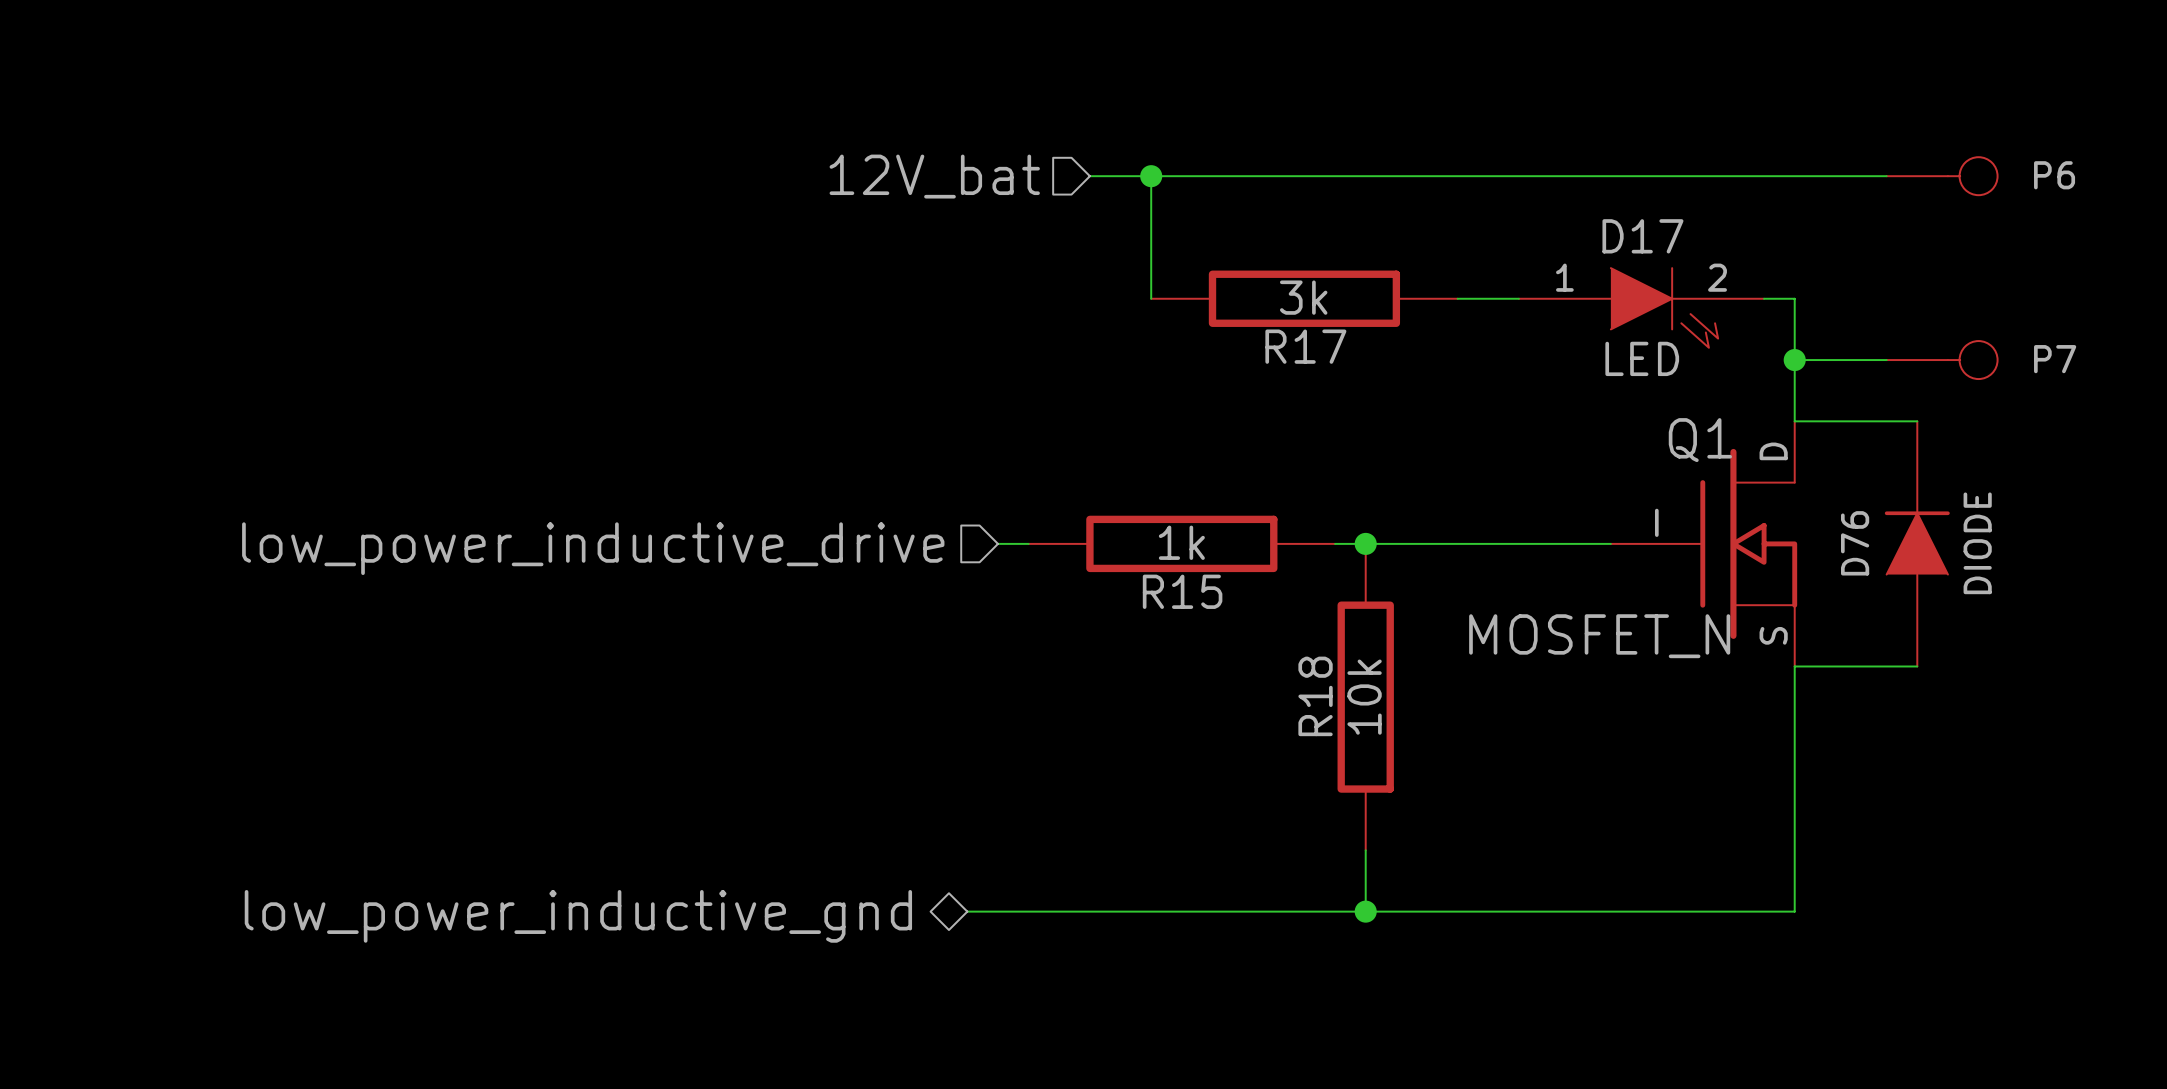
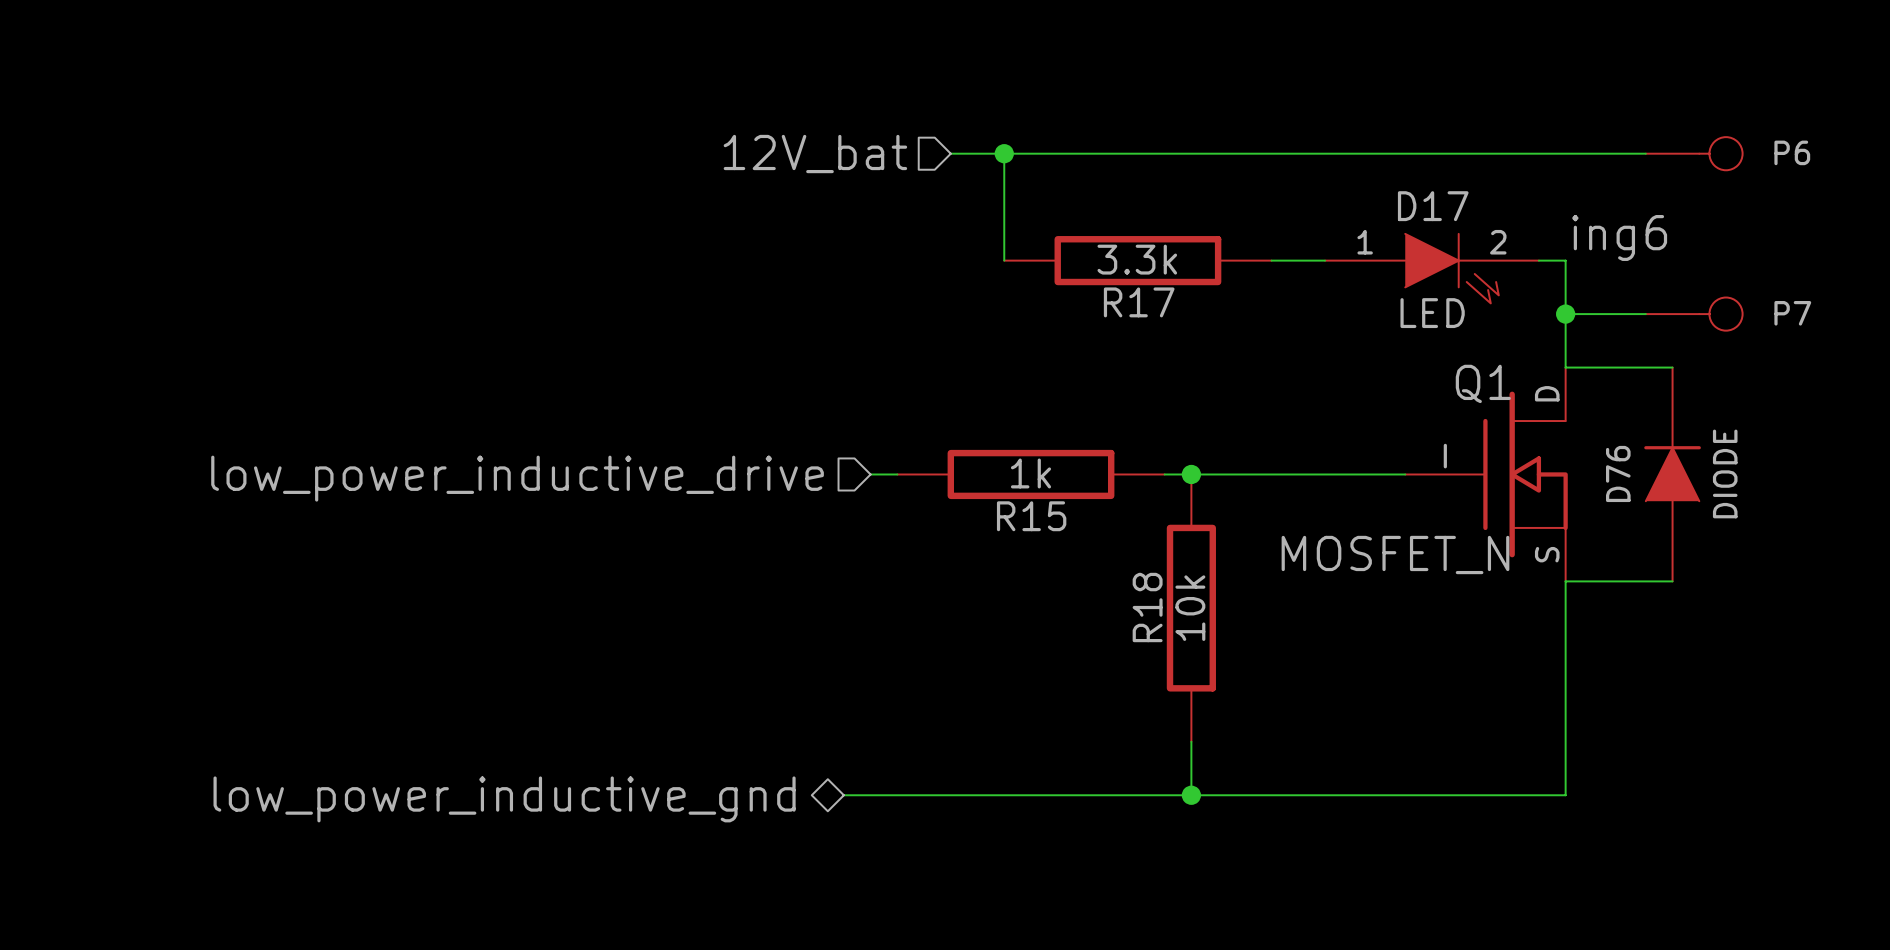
label: none -> ing6 (1619, 237)
R17 value: 3k (1303, 297) -> 3.3k (1137, 259)

